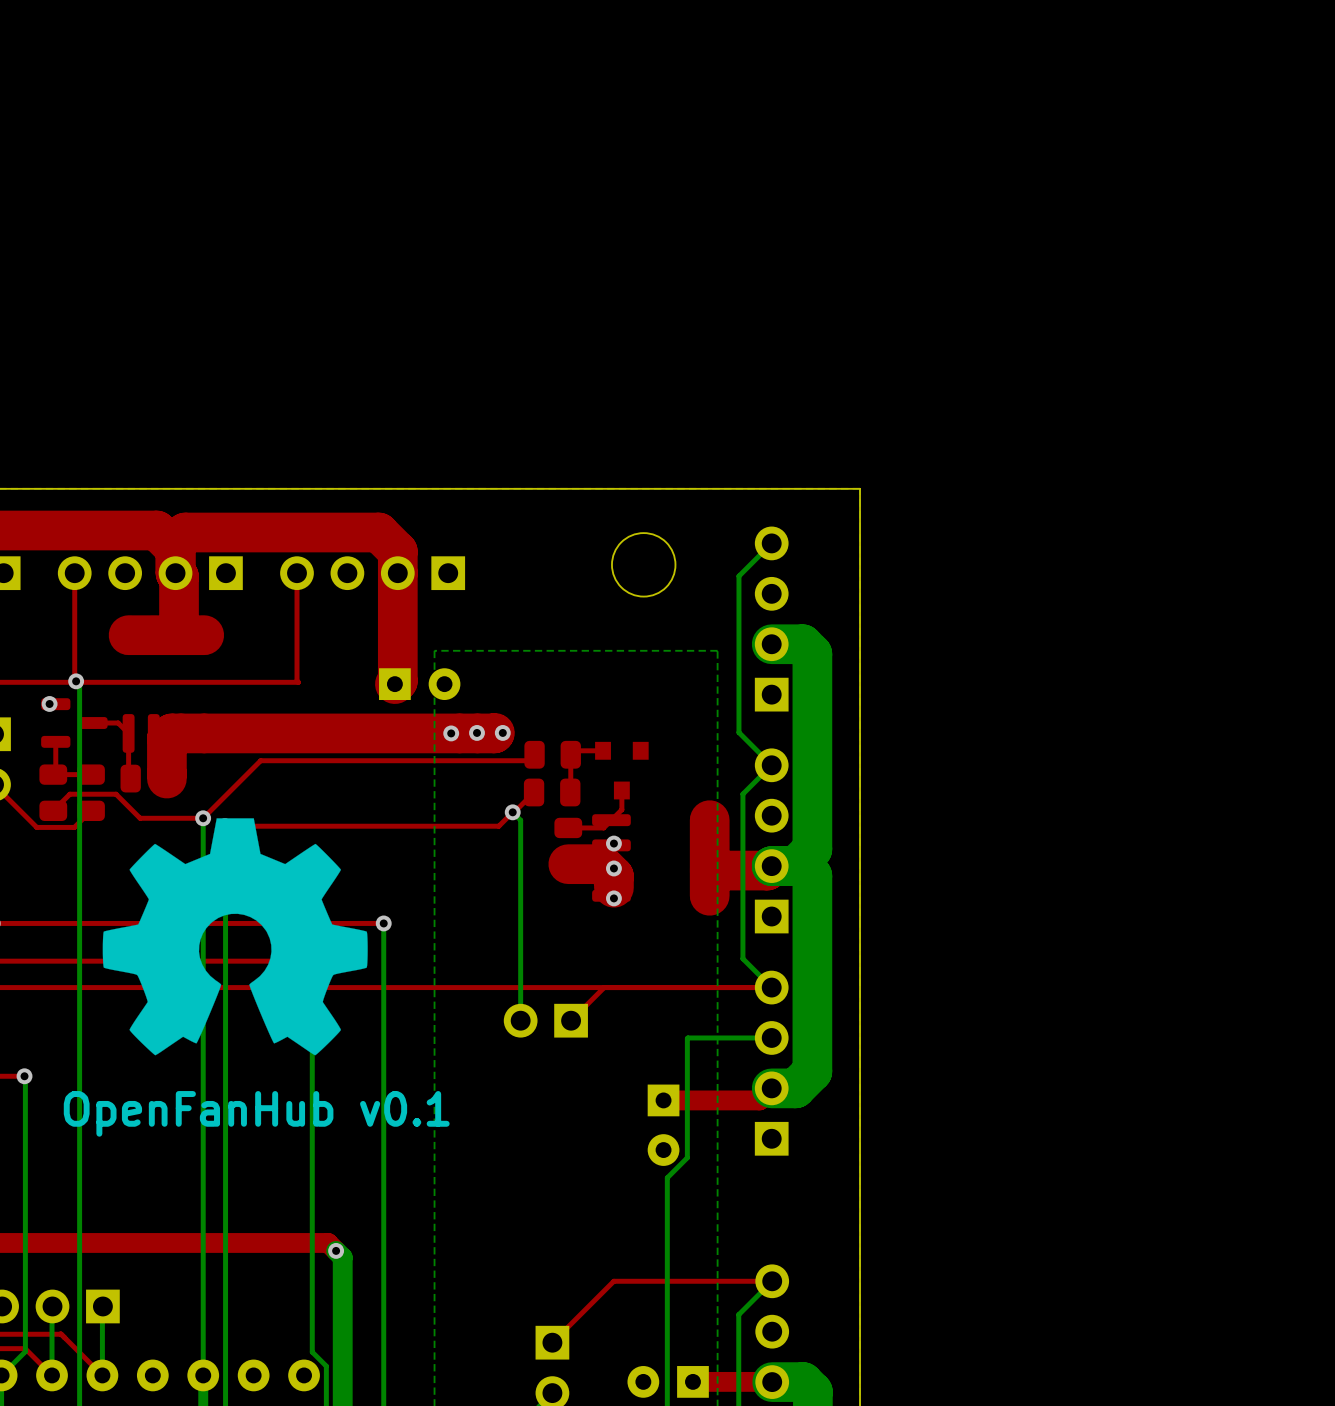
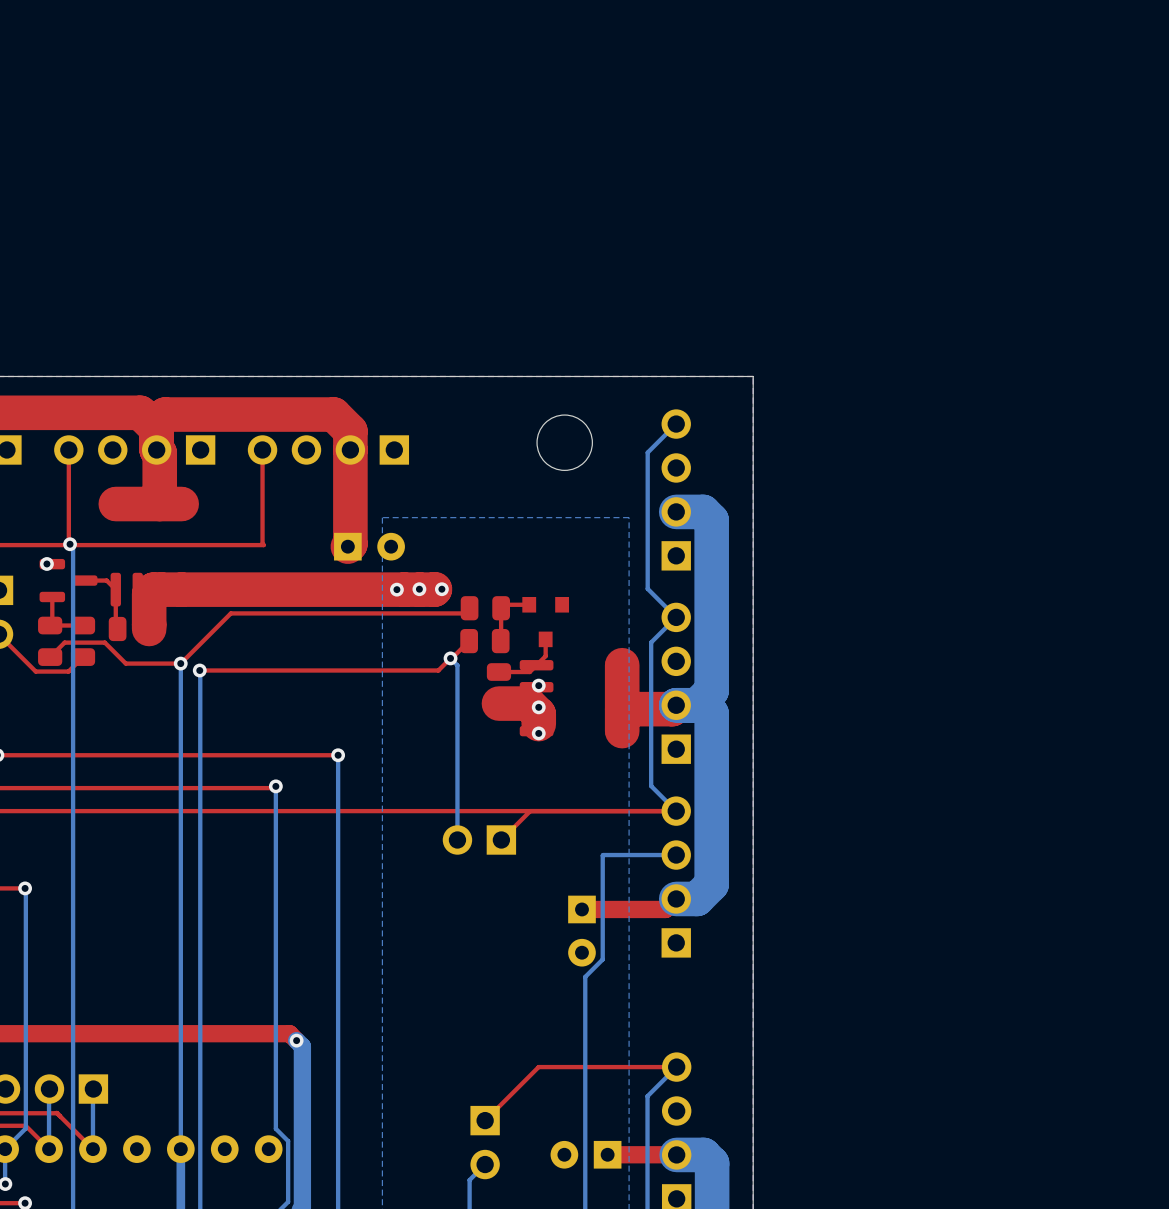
drawing: [102, 818, 368, 1056] -> none
text: OpenFanHub v0.1 (256, 1113) -> none

